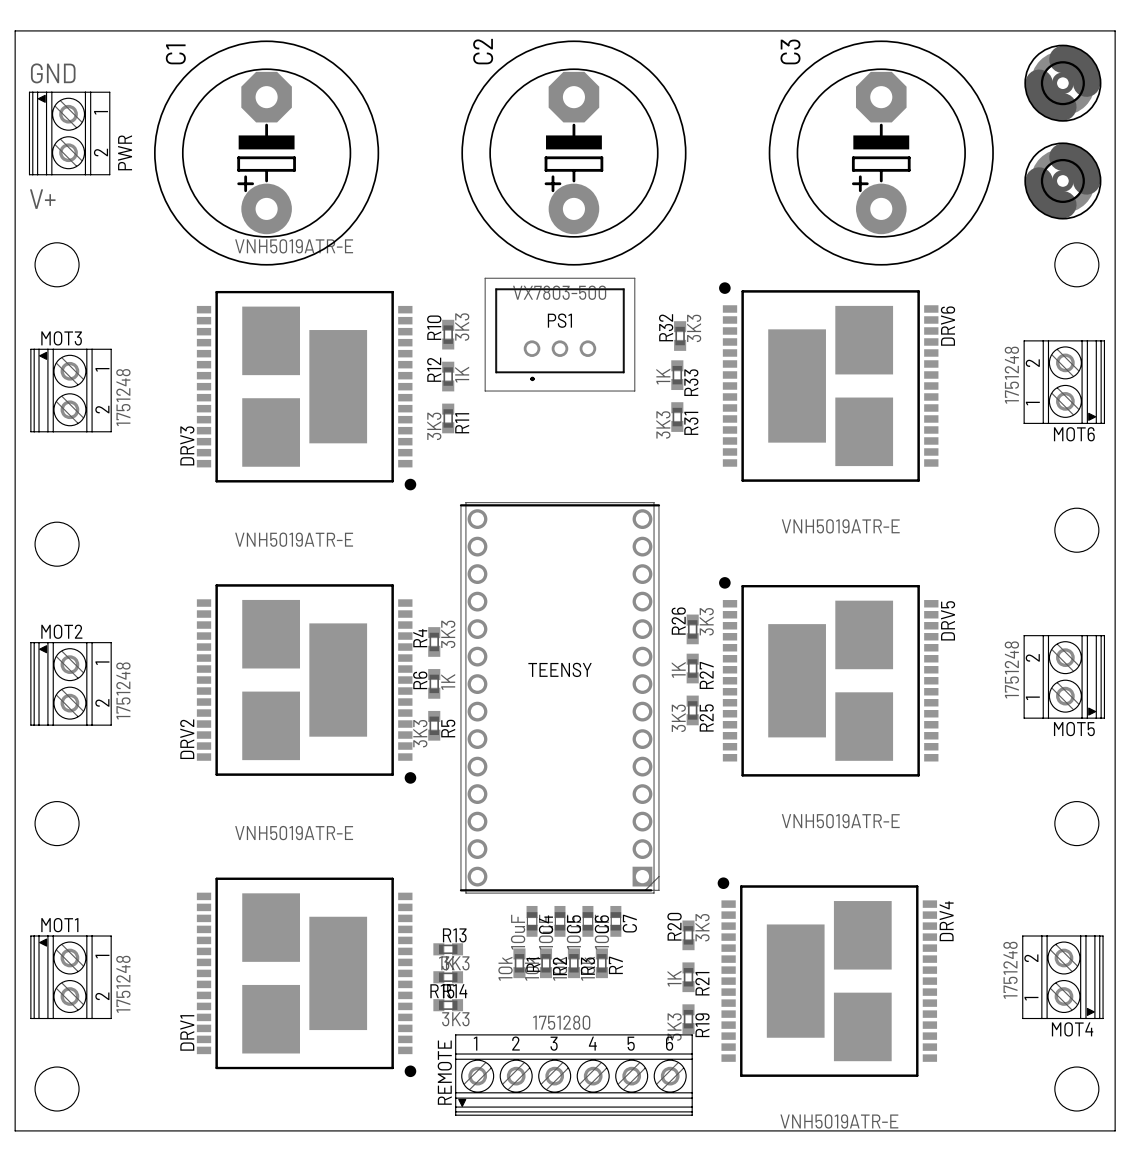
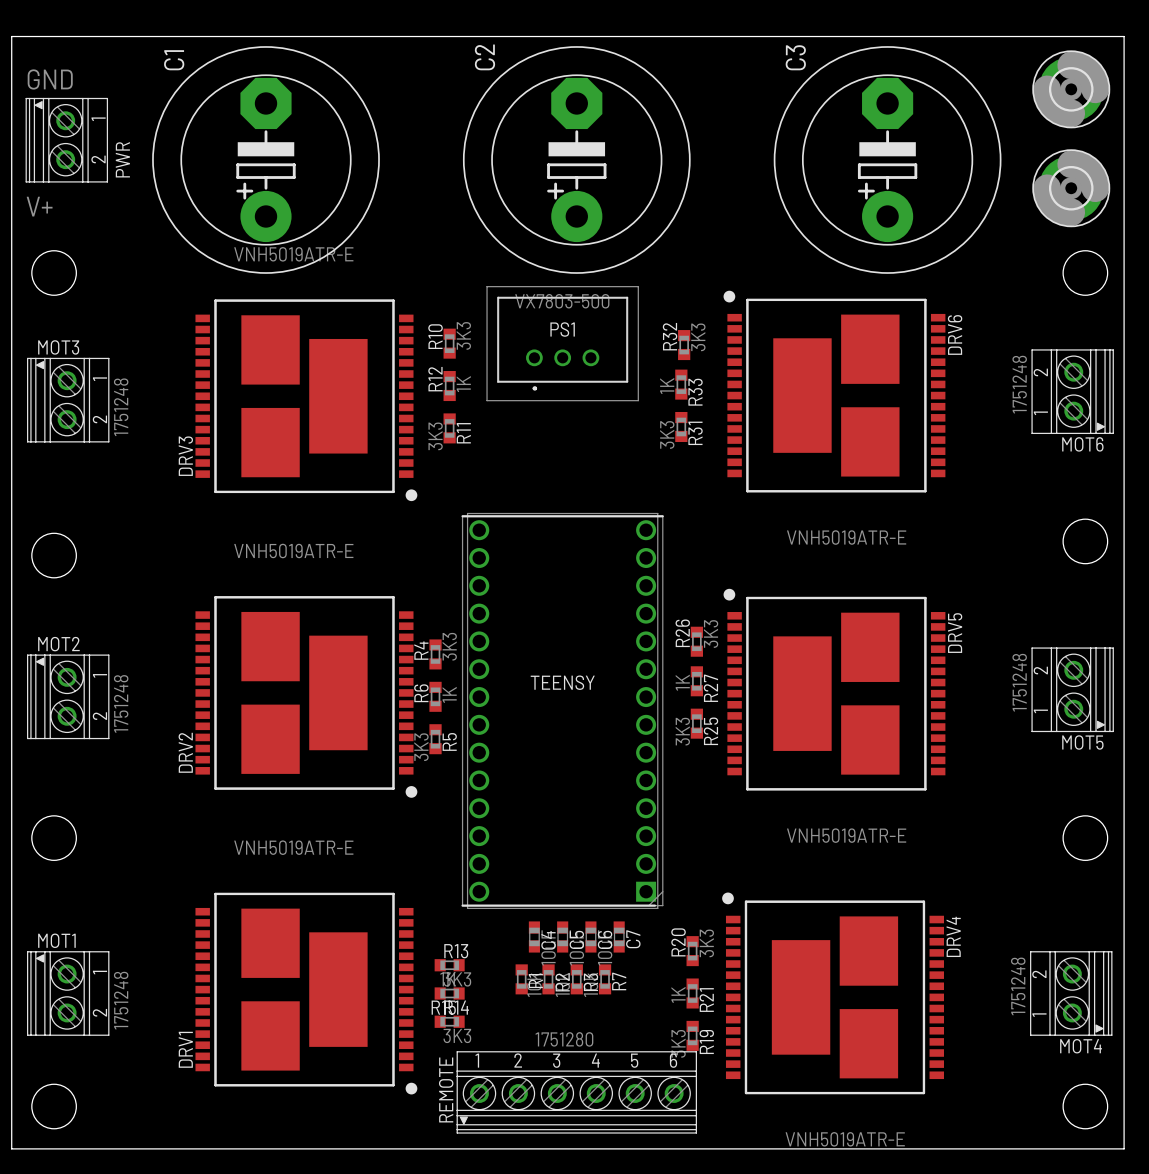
C4 value: 10uF (518, 932) -> none
R1 value: 10k (505, 968) -> none

